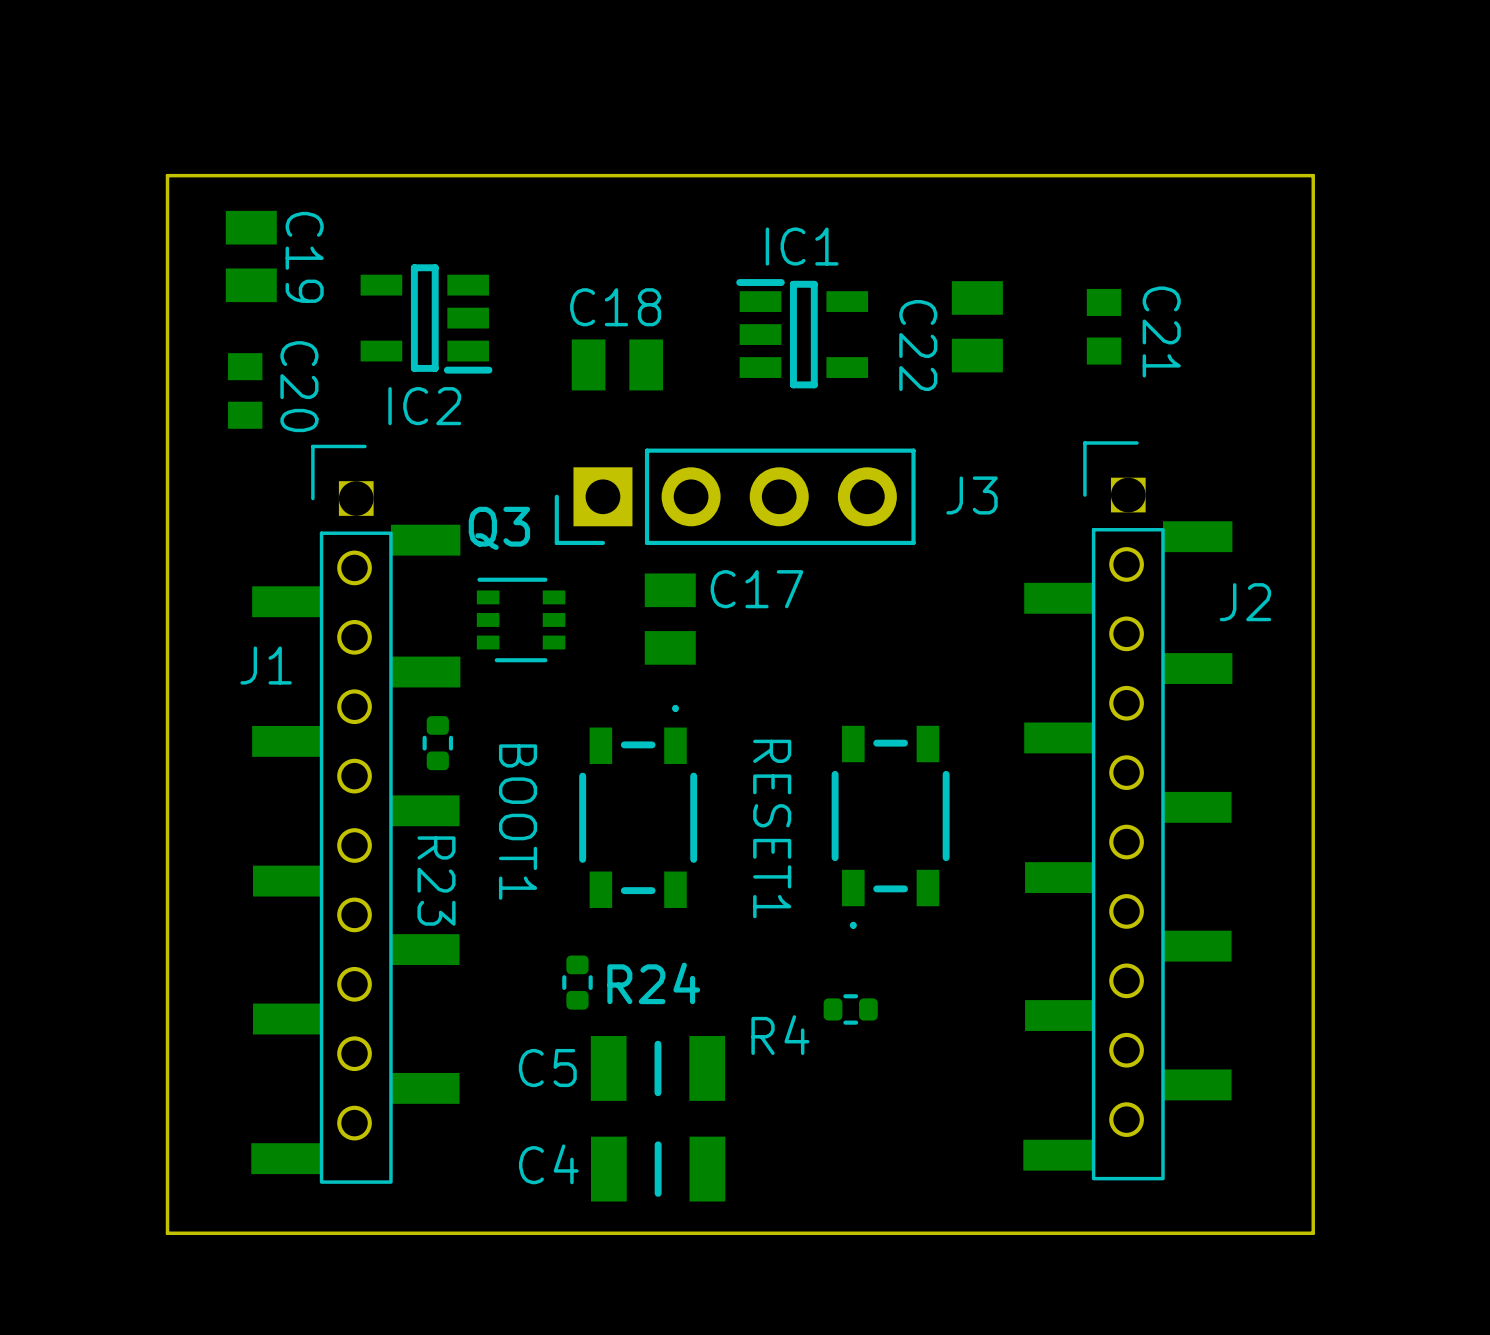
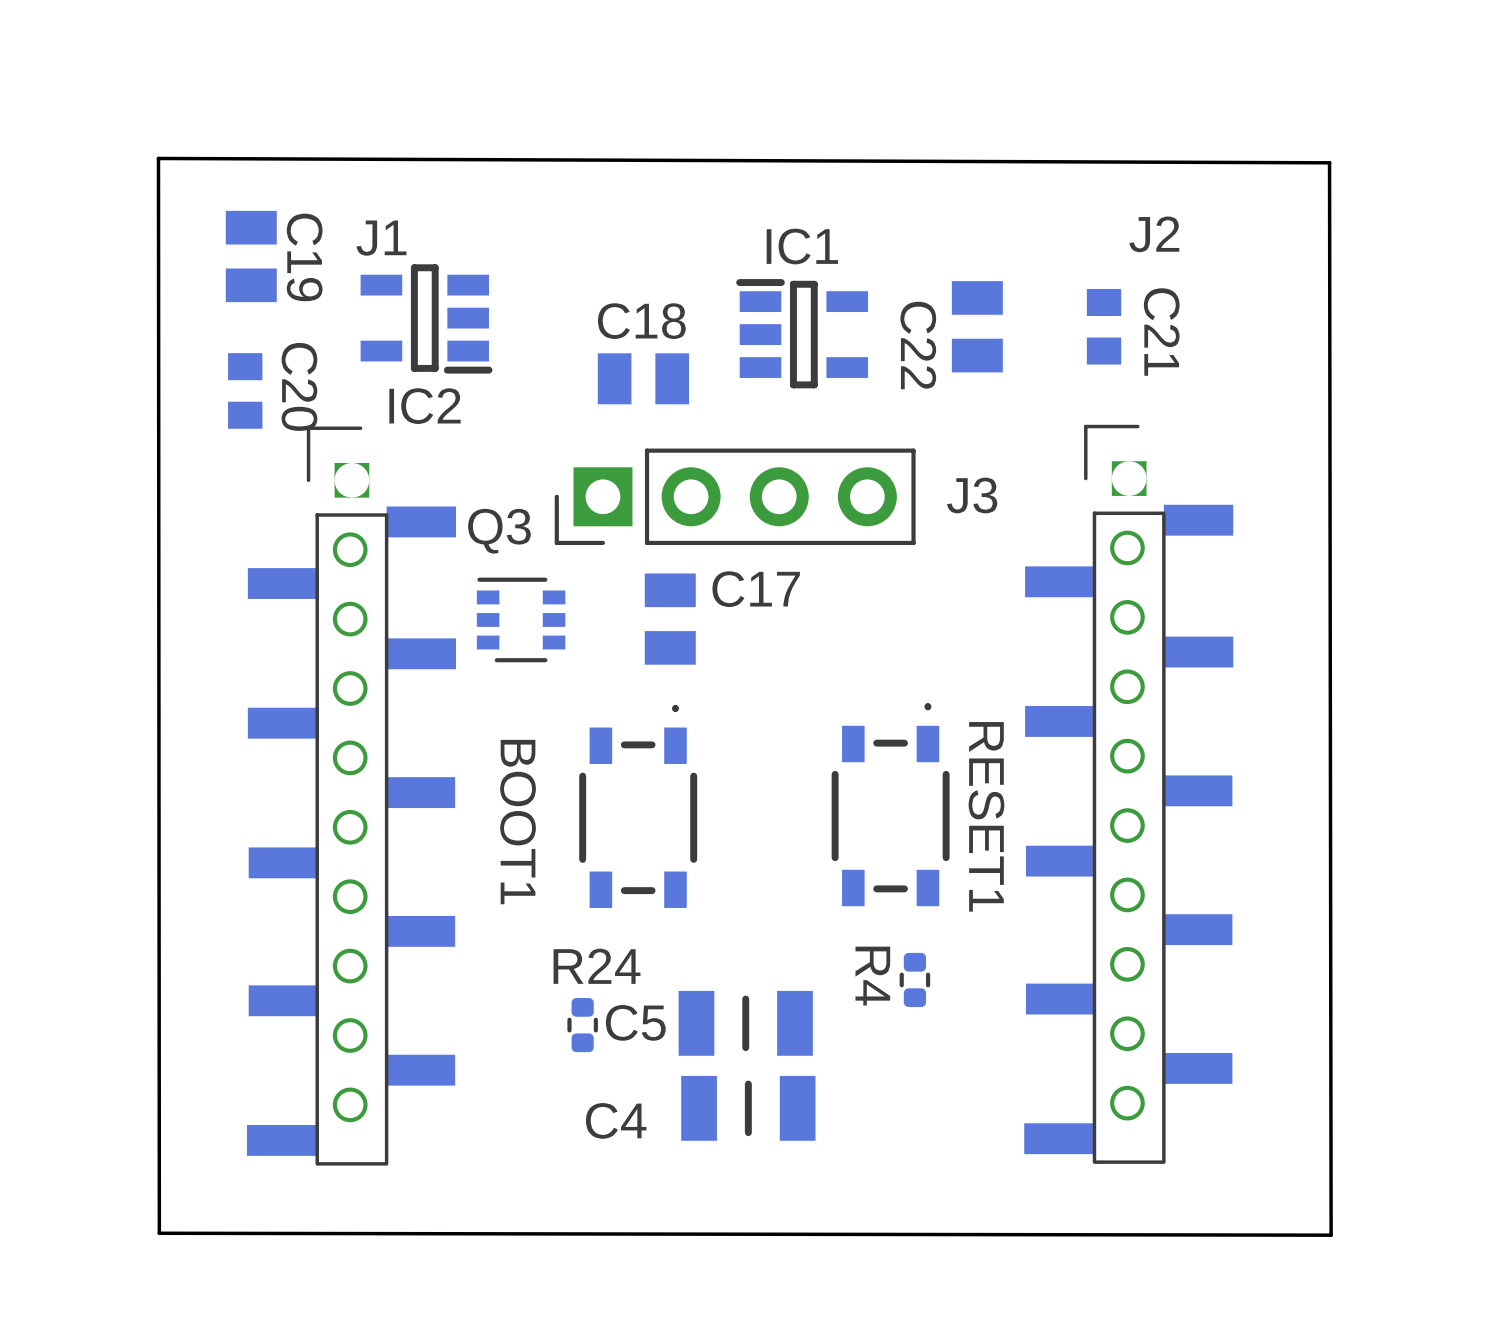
board edge: (1313, 175) (167, 175) (167, 1233) (1313, 1233) (1313, 175) -> (158, 158) (1329, 162) (1331, 1235) (159, 1233) (158, 158)
C18 position: (617, 364) -> (643, 378)
J2 name position: J2 (1245, 602) -> J2 (1154, 234)
J1 name position: J1 (266, 665) -> J1 (381, 238)
R23: (437, 743) -> none
J2 position: (1127, 810) -> (1128, 794)
J1 position: (355, 814) -> (351, 796)
RESET1 rotation: 0° (890, 827) -> 180° (890, 804)
R24 position: (577, 982) -> (582, 1025)
R24 name position: R24 (653, 983) -> R24 (597, 966)
R4 rotation: 0° (850, 1009) -> 90° clockwise (914, 979)
R4 position: (850, 1009) -> (914, 979)
C5 position: (657, 1068) -> (745, 1023)
C4 name position: C4 (548, 1164) -> C4 (616, 1120)
C4 position: (658, 1169) -> (748, 1108)

